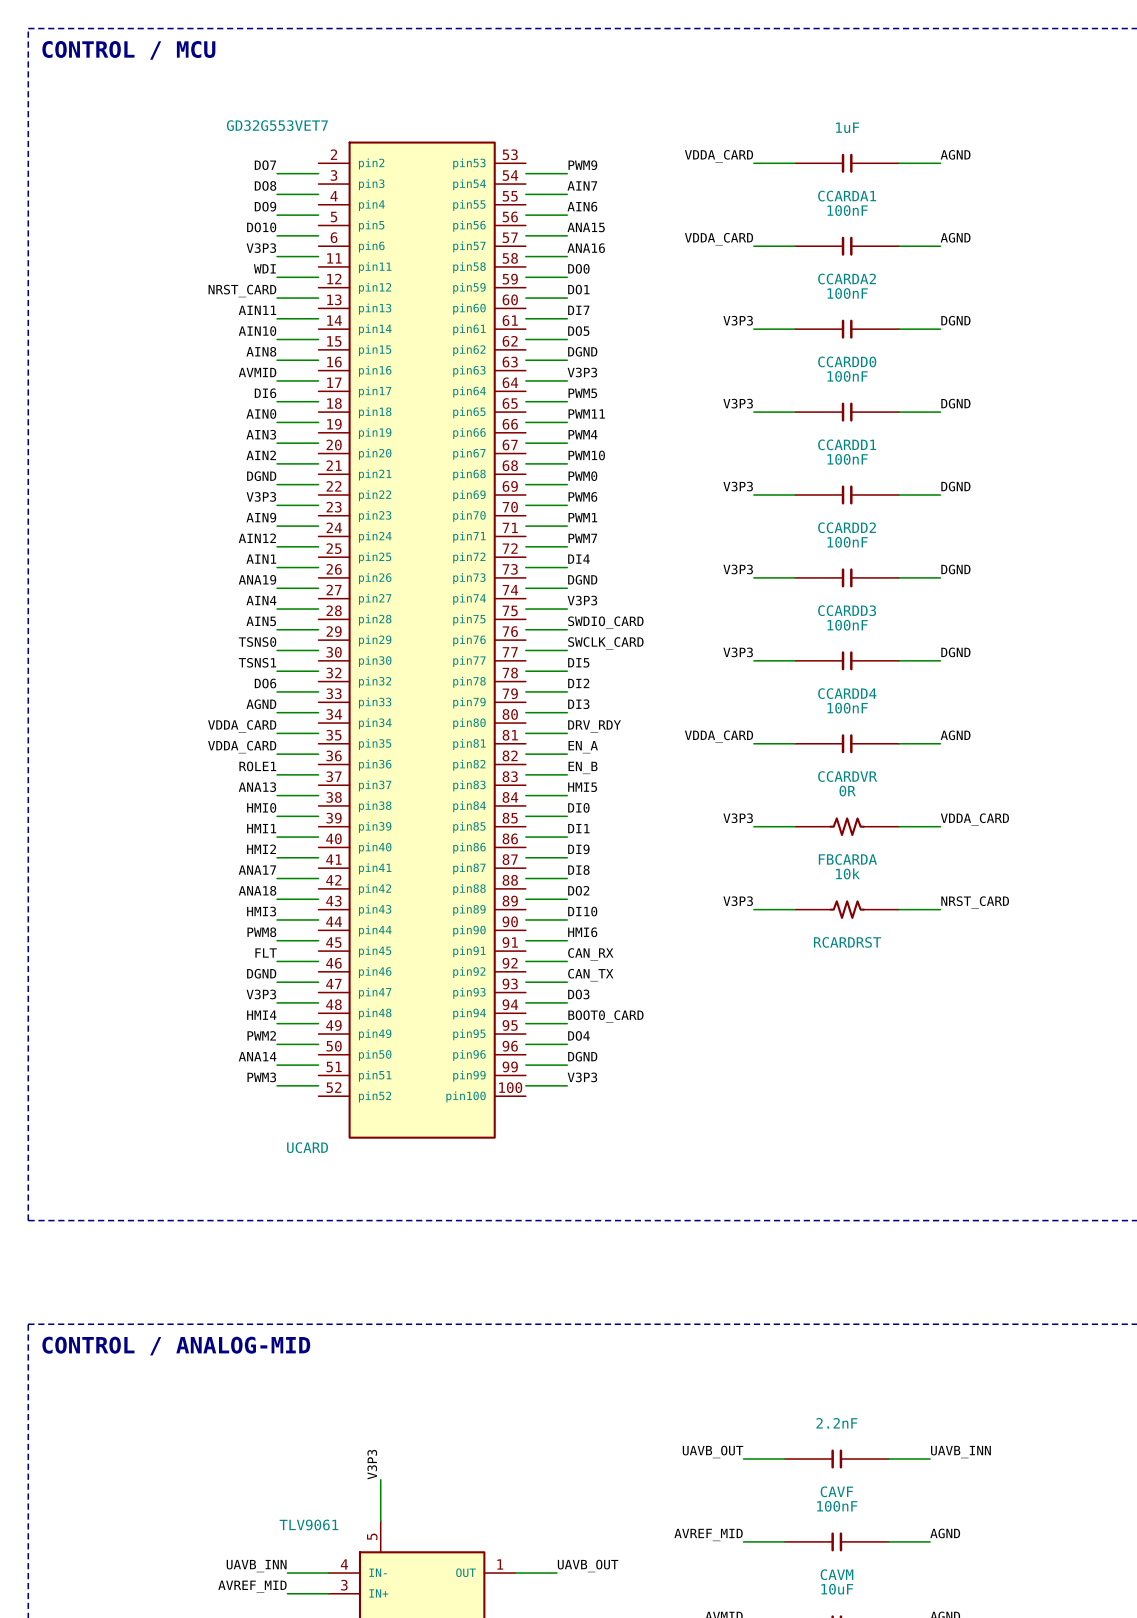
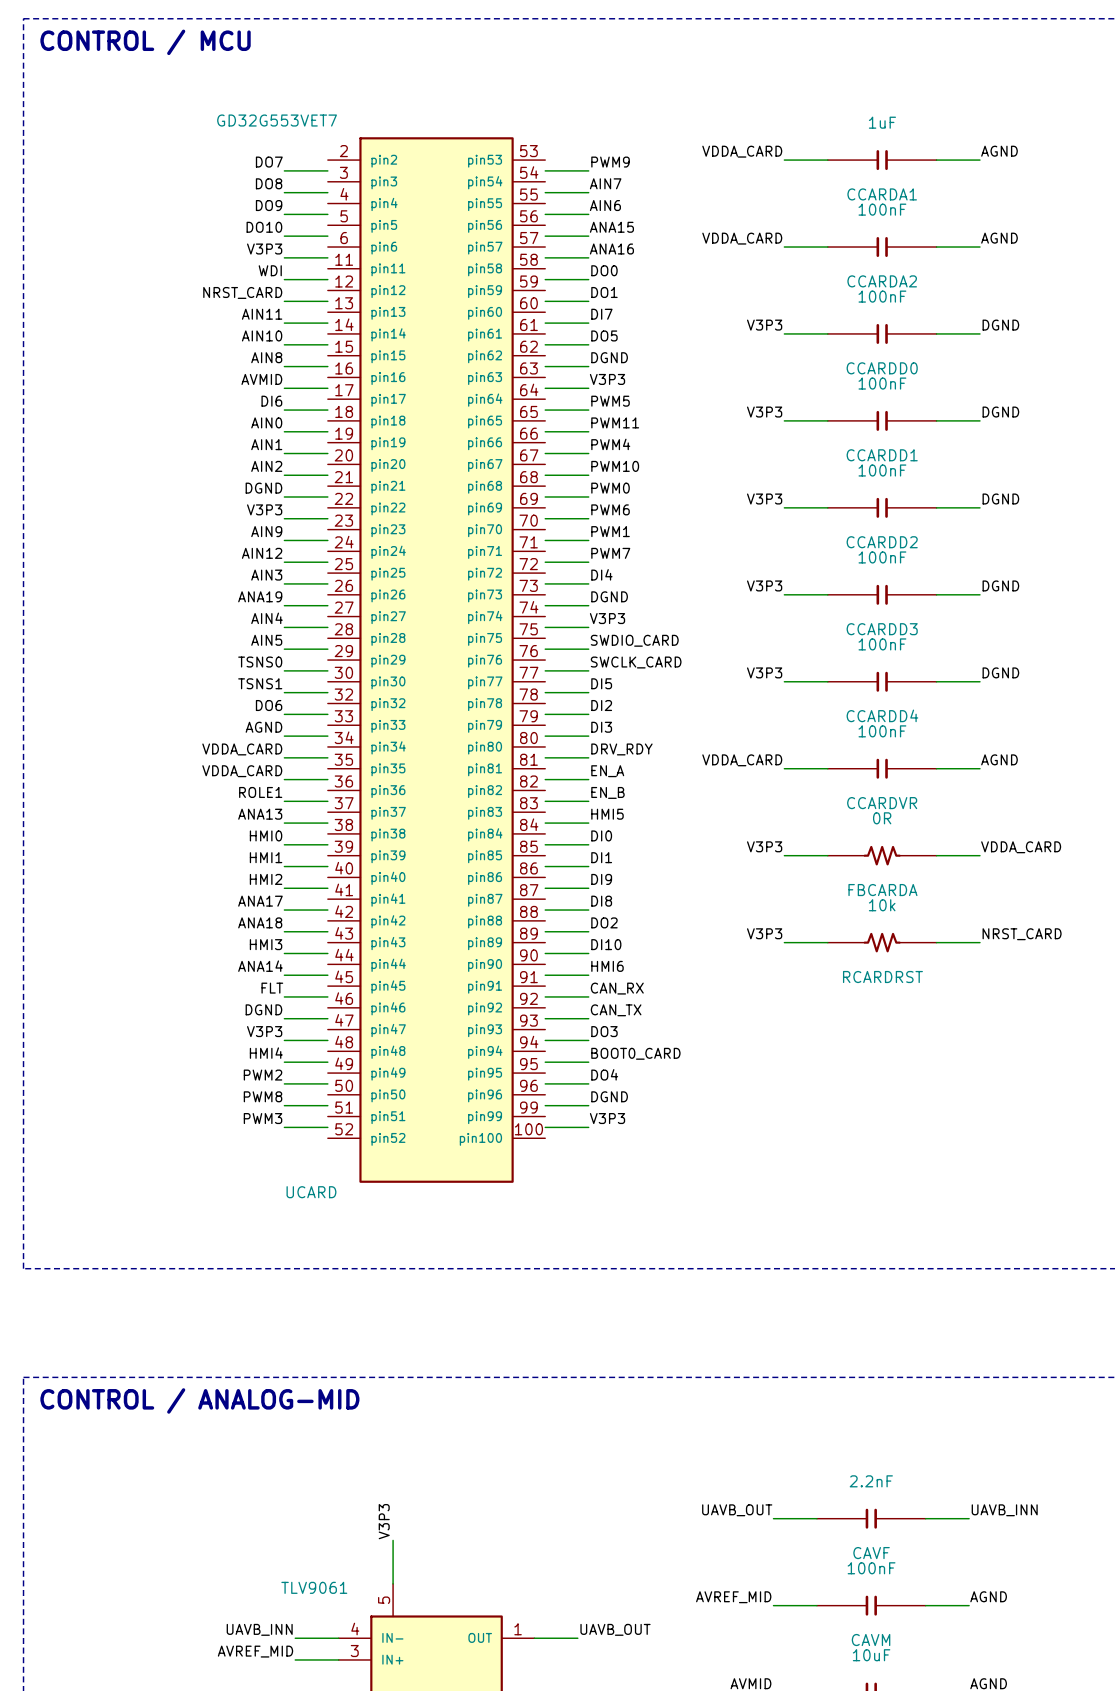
label: AIN3 (261, 434) -> AIN1 (266, 444)
label: AIN1 (261, 559) -> AIN3 (266, 575)
label: PWM8 (261, 932) -> ANA14 (260, 966)
label: ANA14 (257, 1056) -> PWM8 (263, 1096)

